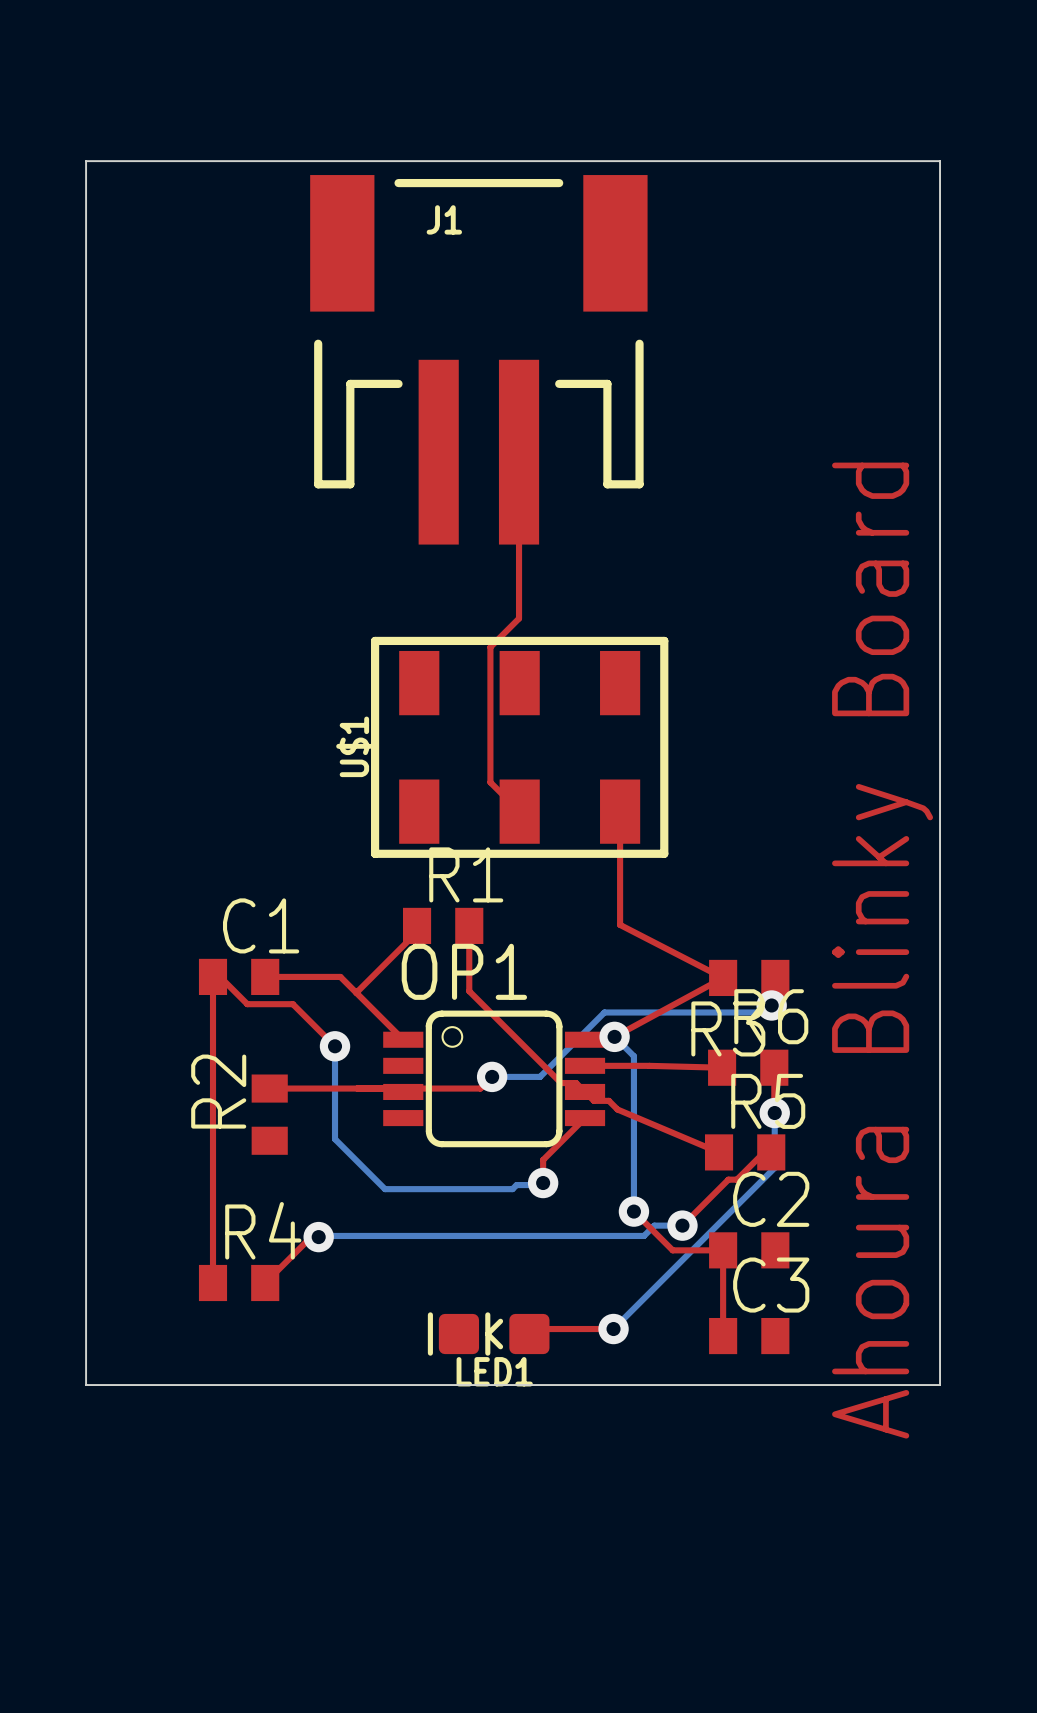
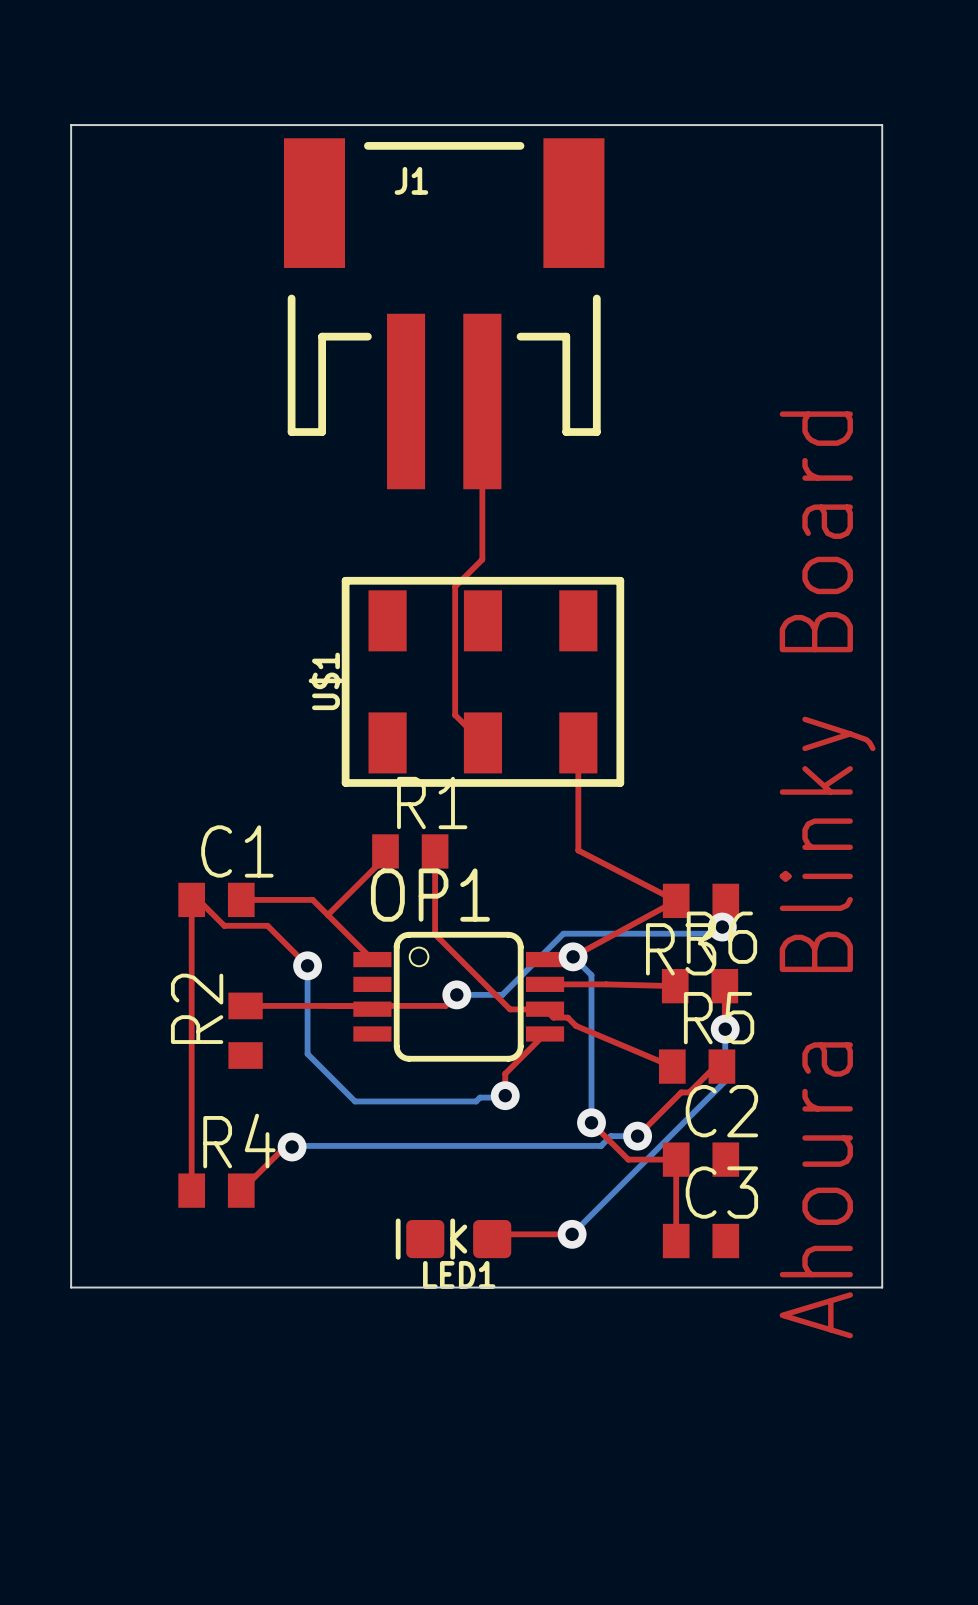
top track: (469, 991) (561, 1083) (576, 1083) (585, 1091) -> (435, 913) (435, 934) (510, 1009) (545, 1009)

